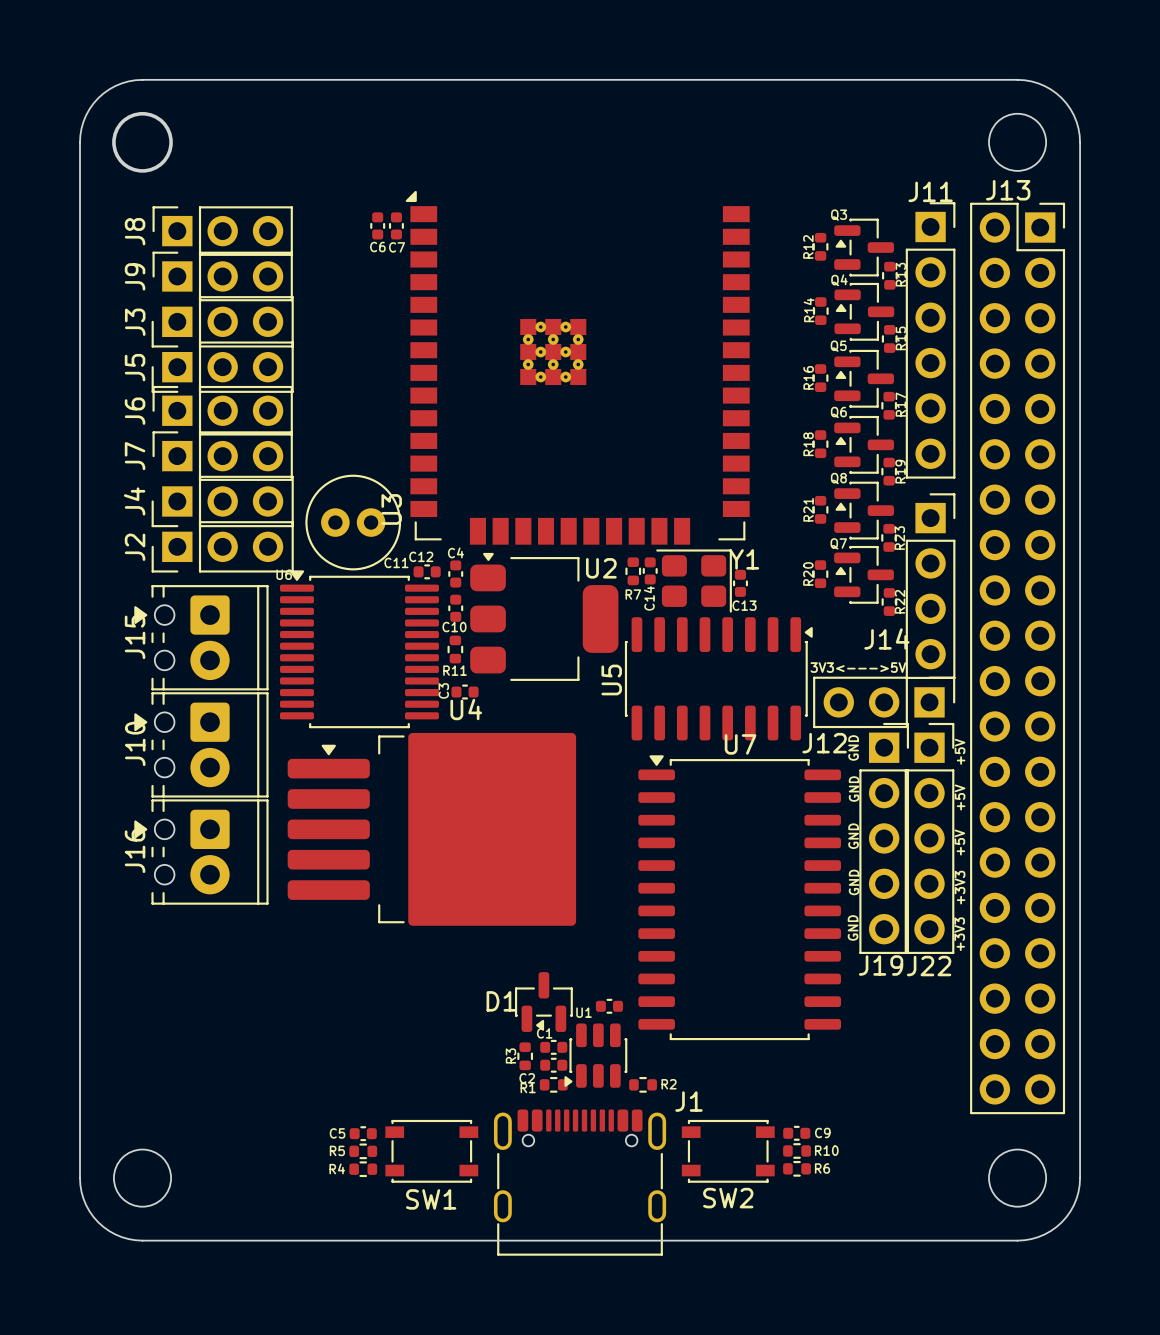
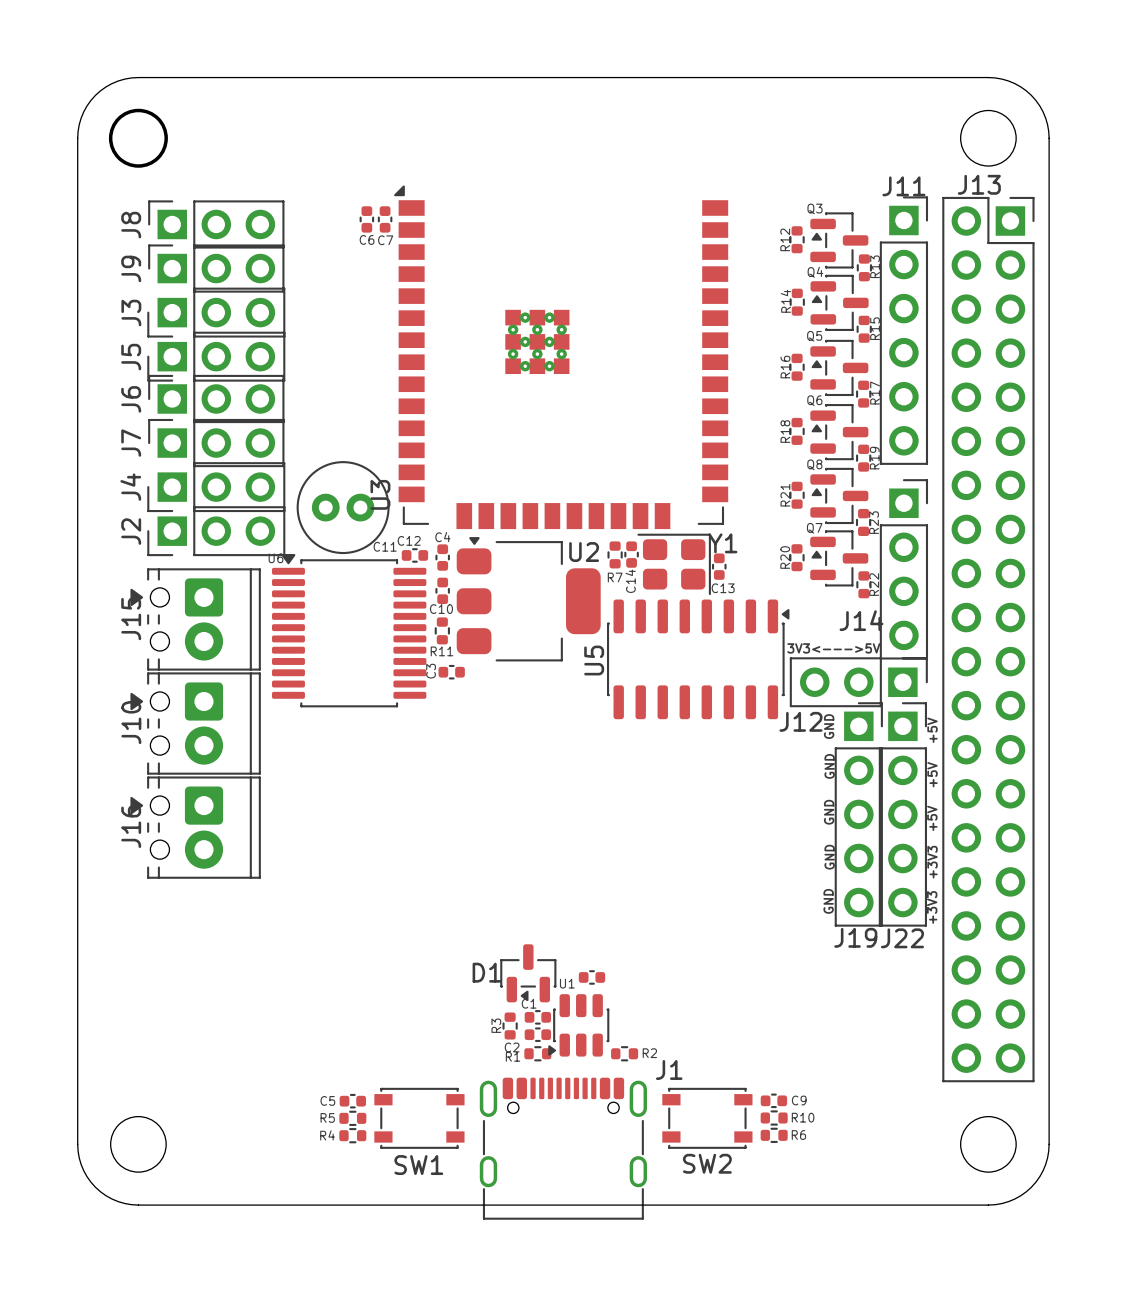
U4: (431, 829) -> none
U7: (739, 897) -> none

